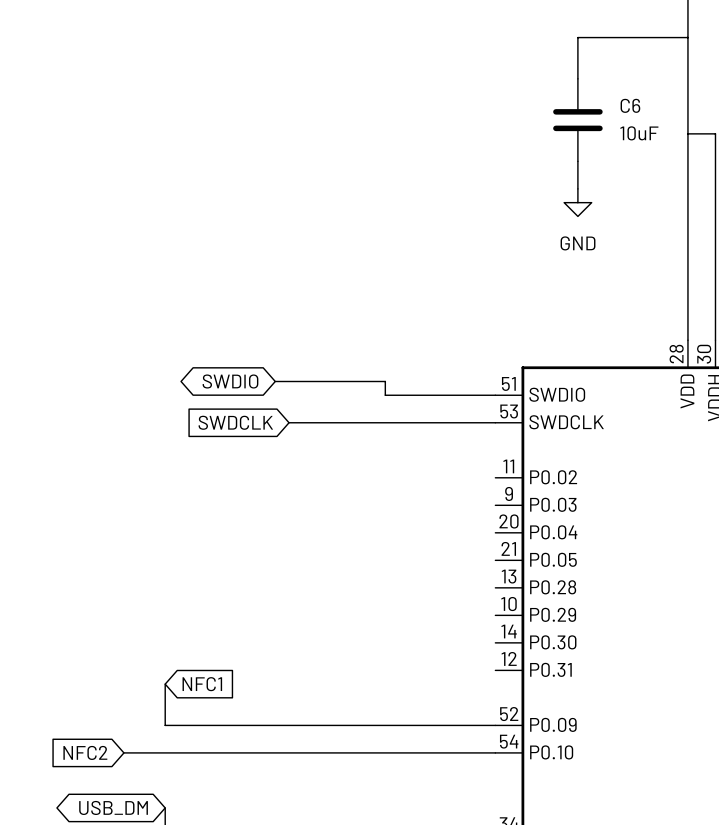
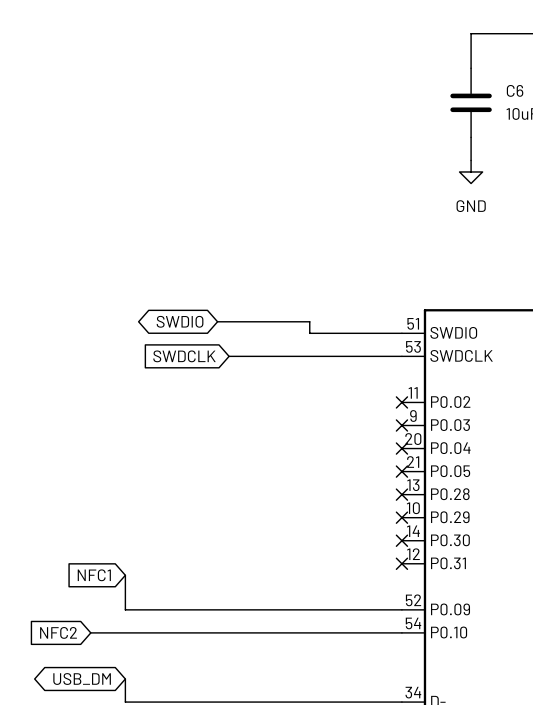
no-connect mark: none -> (401, 402)
no-connect mark: none -> (401, 425)
no-connect mark: none -> (401, 448)
no-connect mark: none -> (401, 471)
no-connect mark: none -> (401, 494)
no-connect mark: none -> (401, 517)
no-connect mark: none -> (401, 540)
no-connect mark: none -> (401, 563)
global label rotation: 0° (202, 684) -> 180° (94, 575)
global label position: NFC1 (202, 684) -> NFC1 (94, 575)

